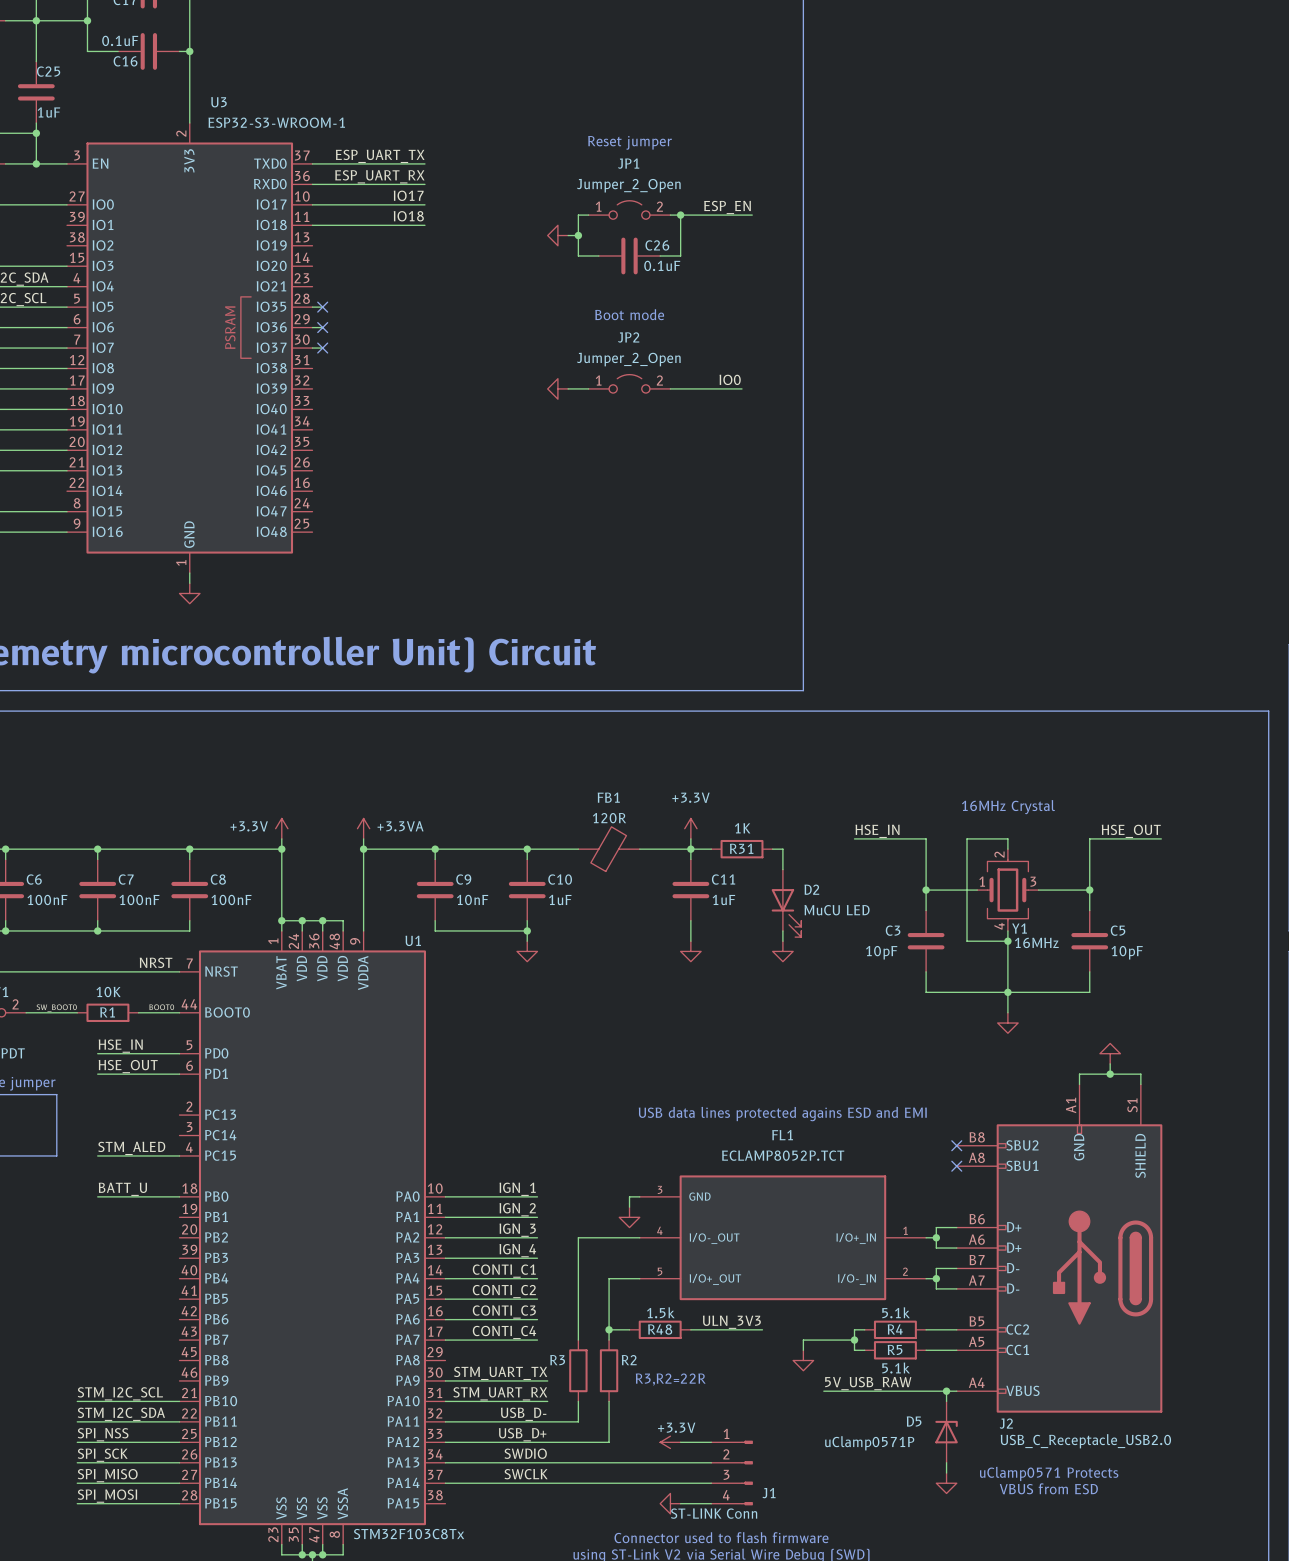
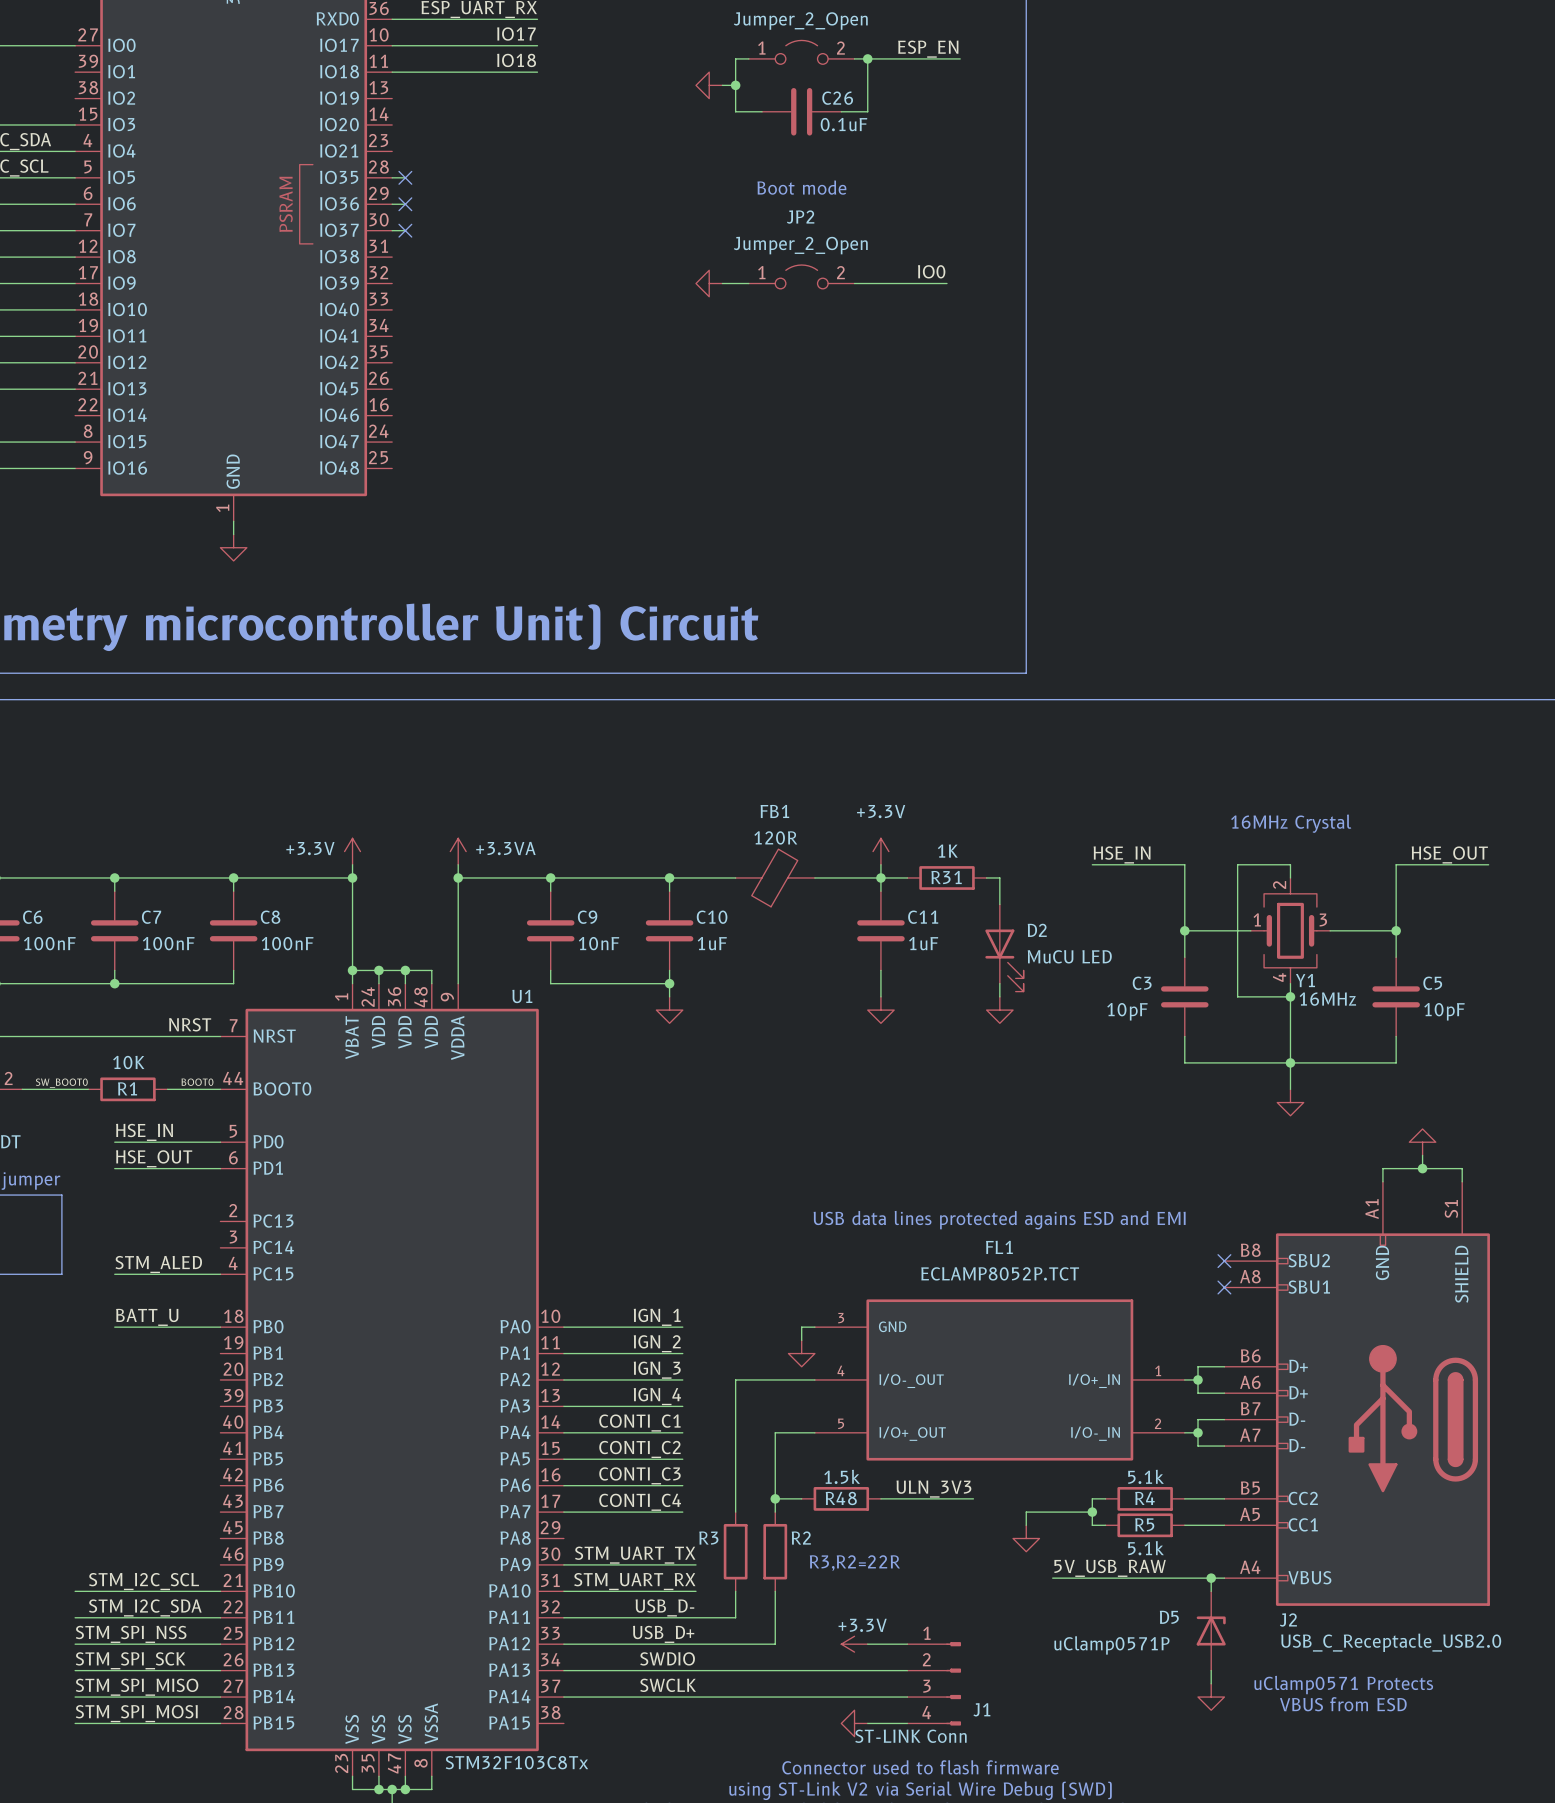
wire: none -> (75, 1591) (88, 1591)
wire: none -> (75, 1617) (88, 1617)
label: SPI_NSS (103, 1434) -> STM_SPI_NSS (131, 1634)
wire: none -> (75, 1644) (88, 1644)
label: SPI_SCK (102, 1455) -> STM_SPI_SCK (130, 1660)
wire: none -> (75, 1670) (88, 1670)
label: SPI_MISO (107, 1475) -> STM_SPI_MISO (137, 1687)
wire: none -> (75, 1697) (88, 1697)
label: SPI_MOSI (107, 1496) -> STM_SPI_MOSI (136, 1713)
wire: none -> (75, 1723) (88, 1723)

